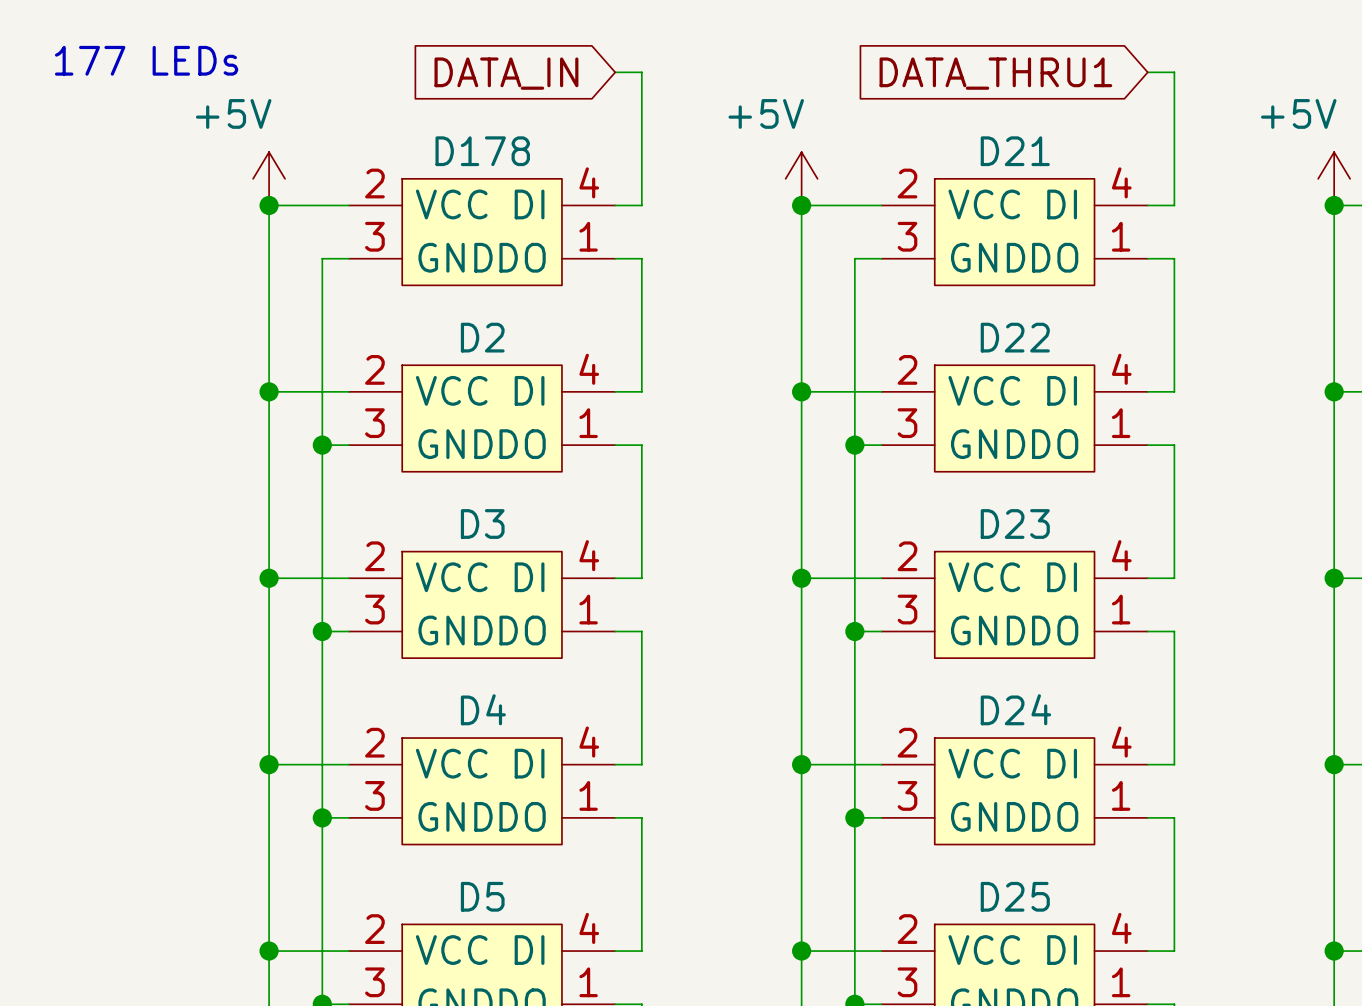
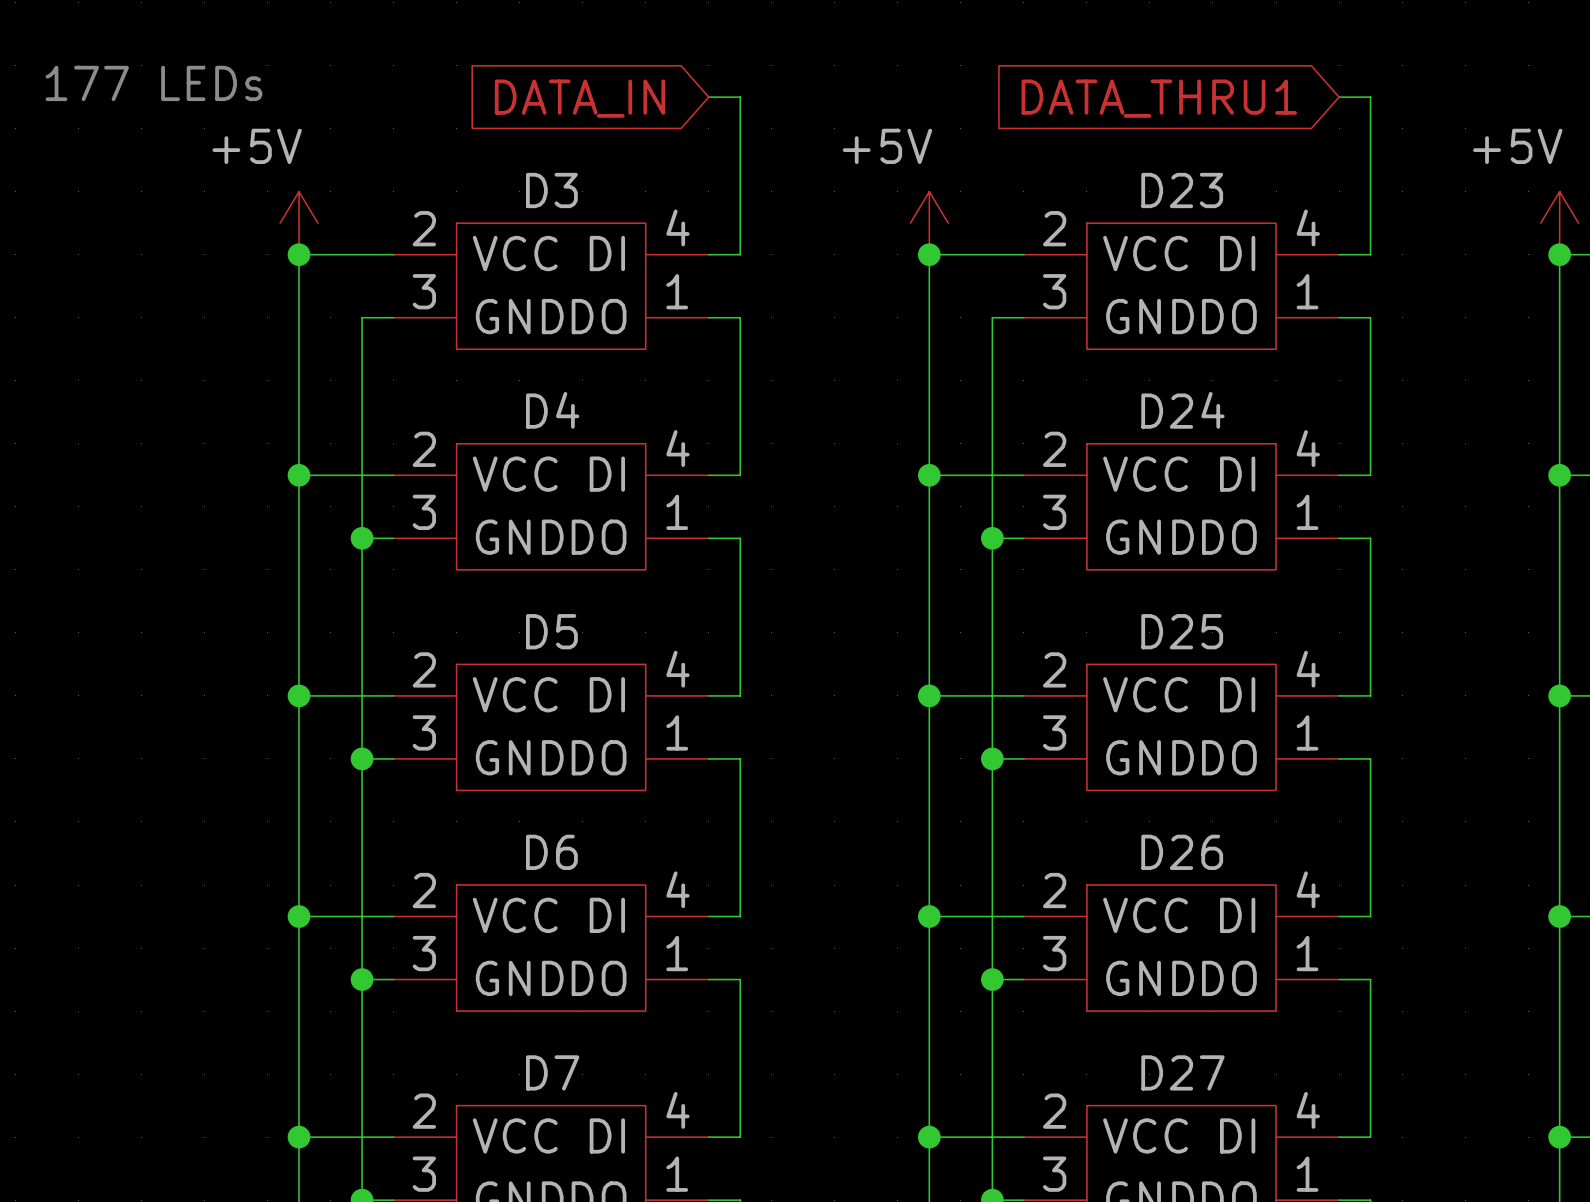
D178 name: D178 (482, 151) -> D3 (551, 190)
D21 name: D21 (1015, 151) -> D23 (1182, 190)
D2 name: D2 (482, 337) -> D4 (552, 410)
D22 name: D22 (1015, 337) -> D24 (1182, 410)
D3 name: D3 (482, 524) -> D5 (551, 631)
D23 name: D23 (1015, 524) -> D25 (1182, 631)
D4 name: D4 (483, 709) -> D6 (551, 852)
D24 name: D24 (1015, 709) -> D26 (1182, 852)
D5 name: D5 (482, 896) -> D7 (552, 1072)
D25 name: D25 (1015, 896) -> D27 (1182, 1072)

